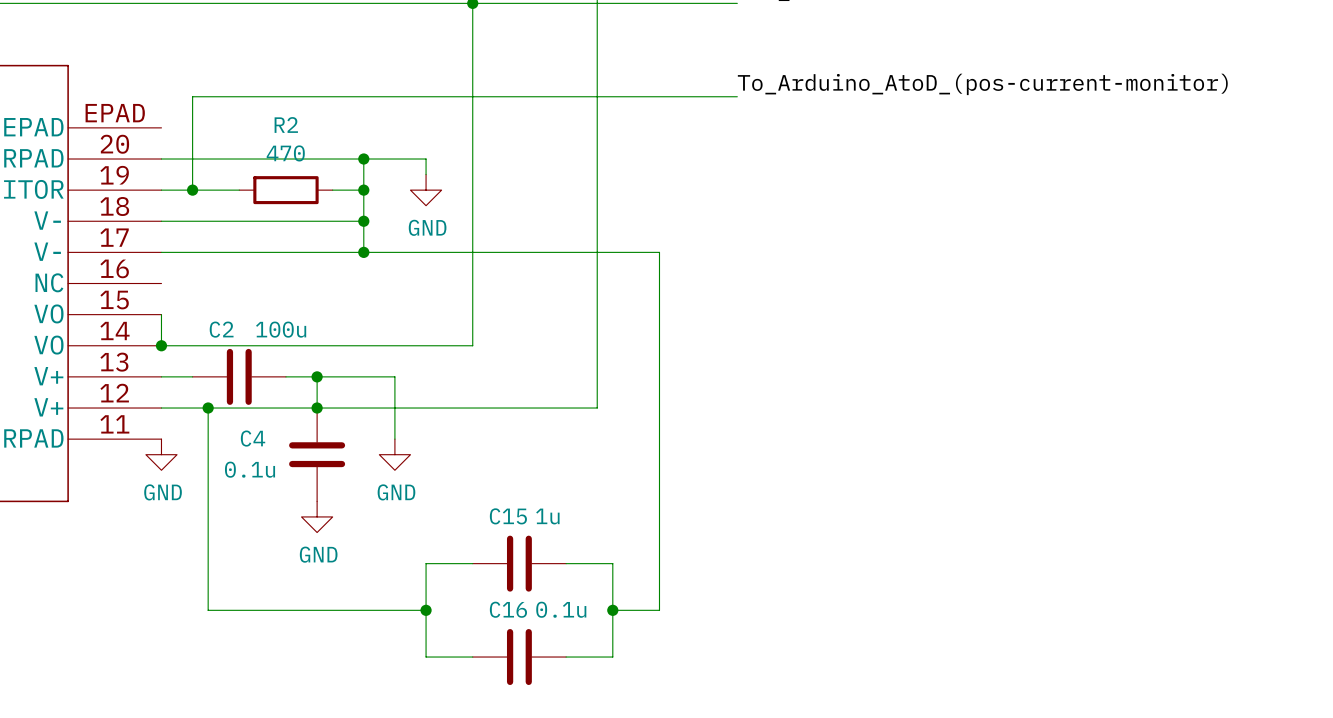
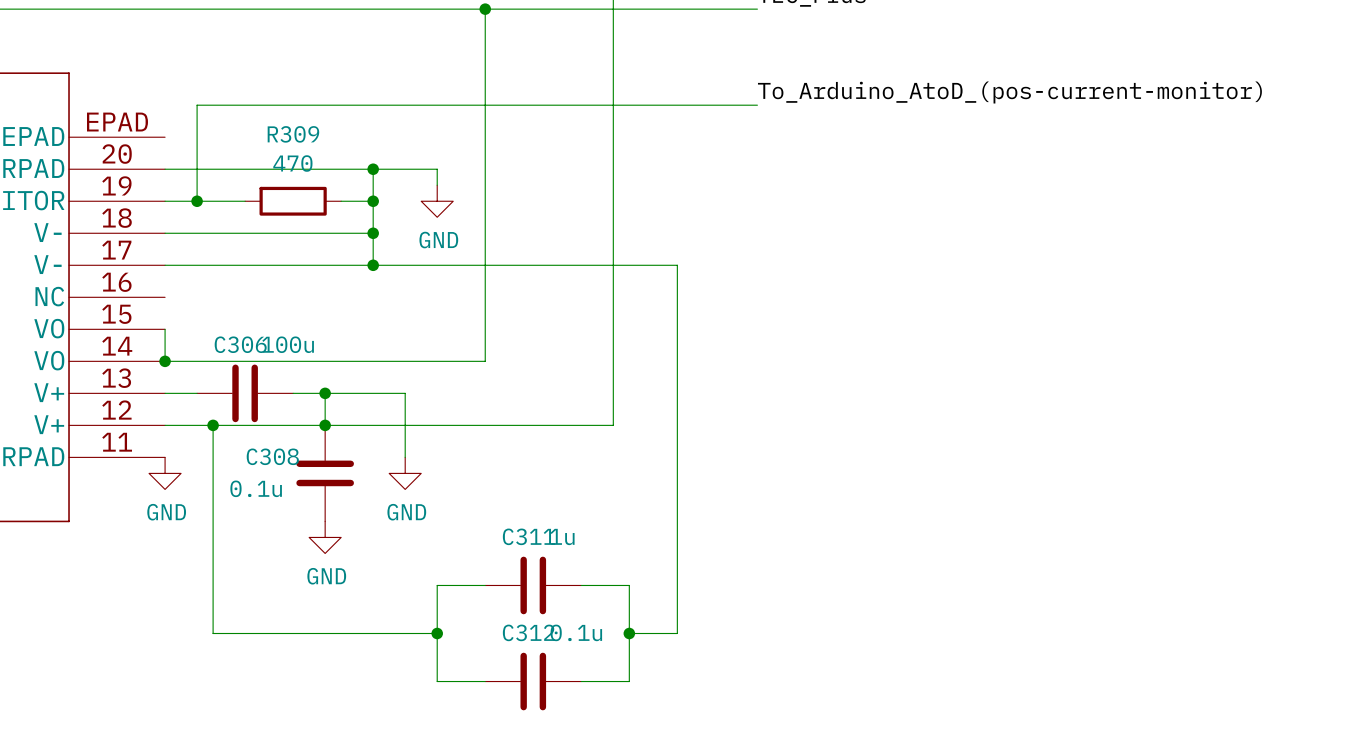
R2 name: R2 (286, 124) -> R309 (293, 134)
C2 name: C2 (221, 329) -> C306 (240, 344)
C4 name: C4 (253, 438) -> C308 (272, 456)
C15 name: C15 (508, 516) -> C311 (529, 536)
C16 name: C16 (508, 609) -> C312 (528, 632)

